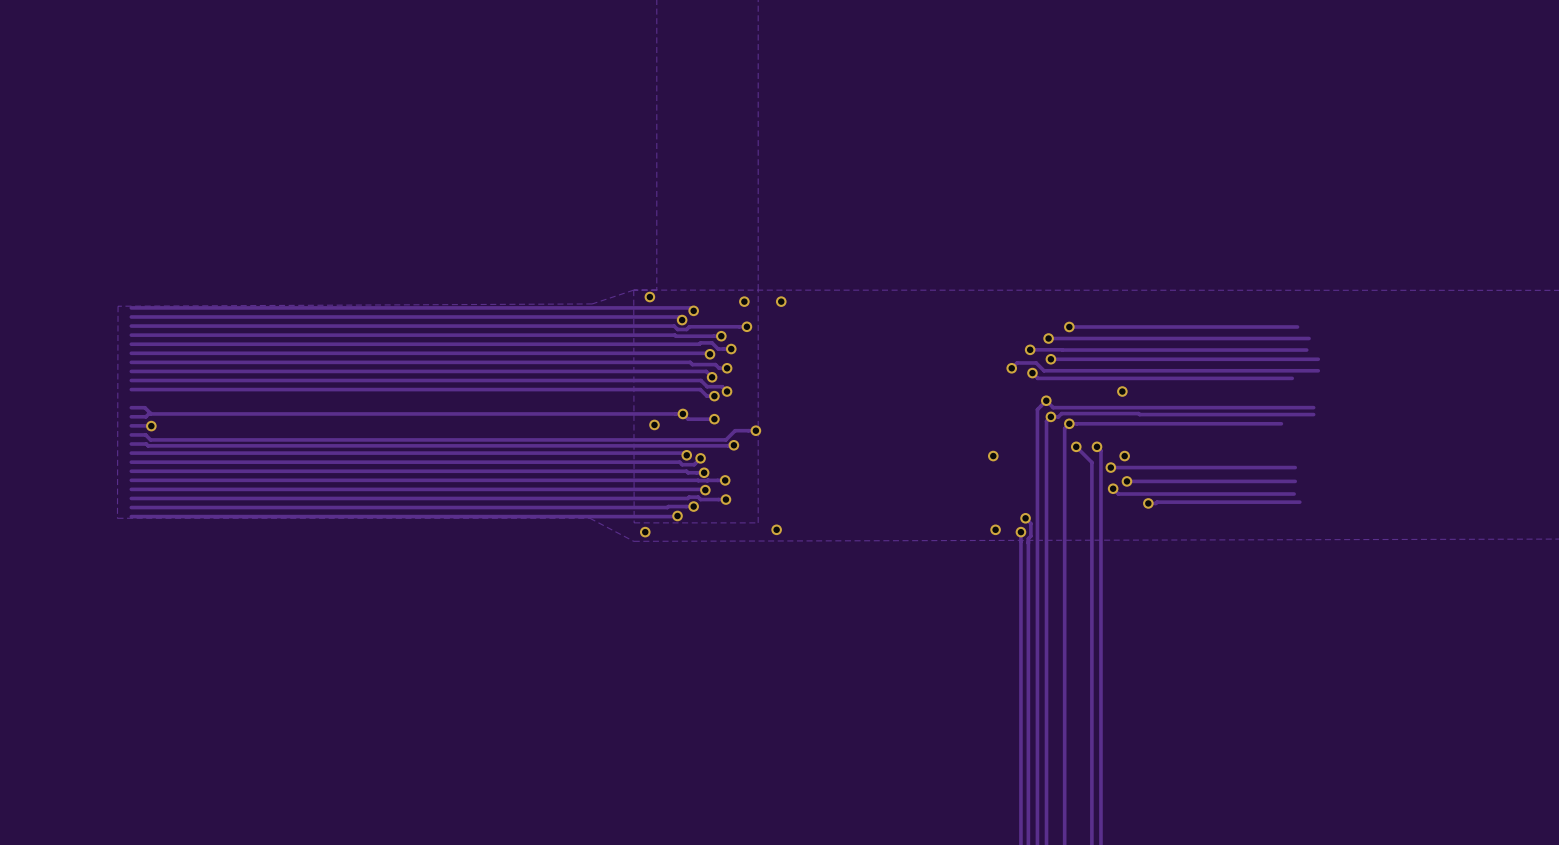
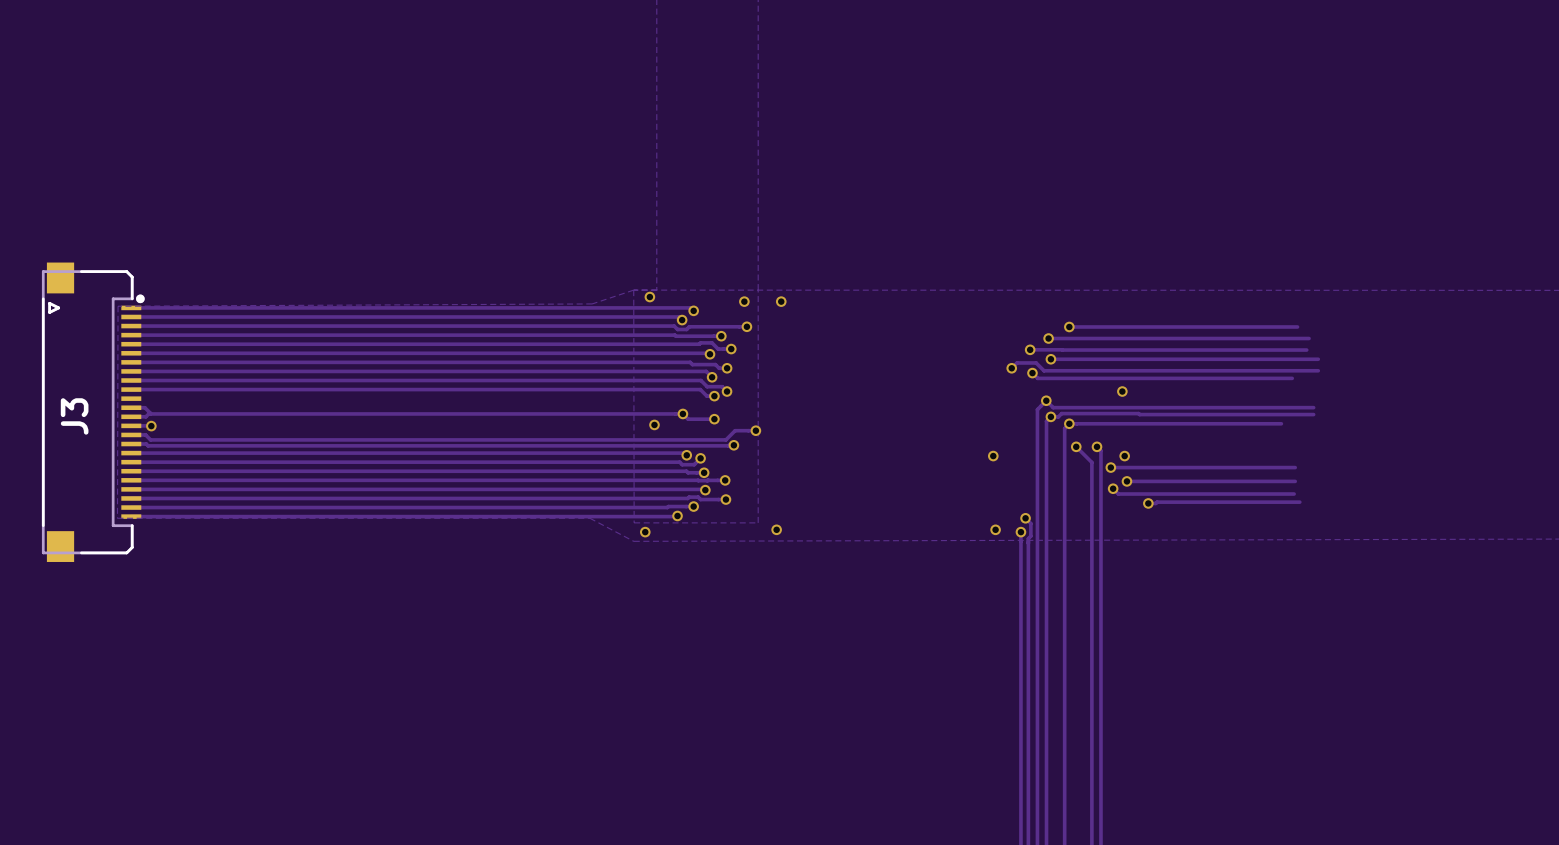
J3: none -> (93, 412)

